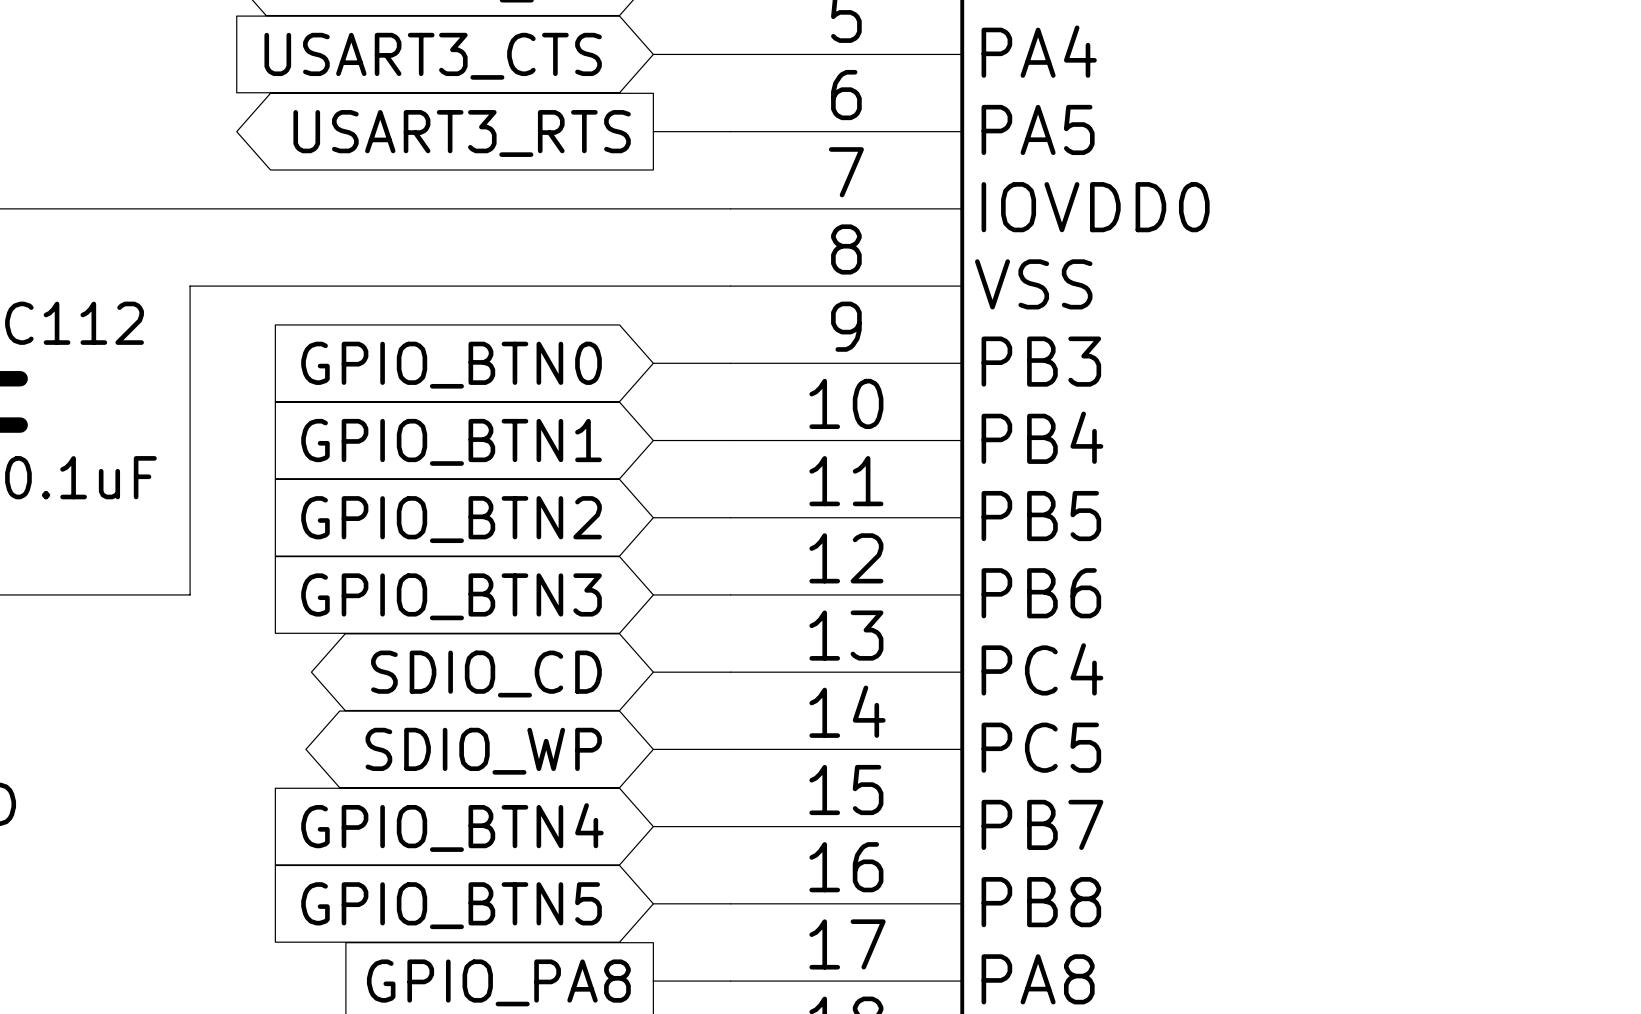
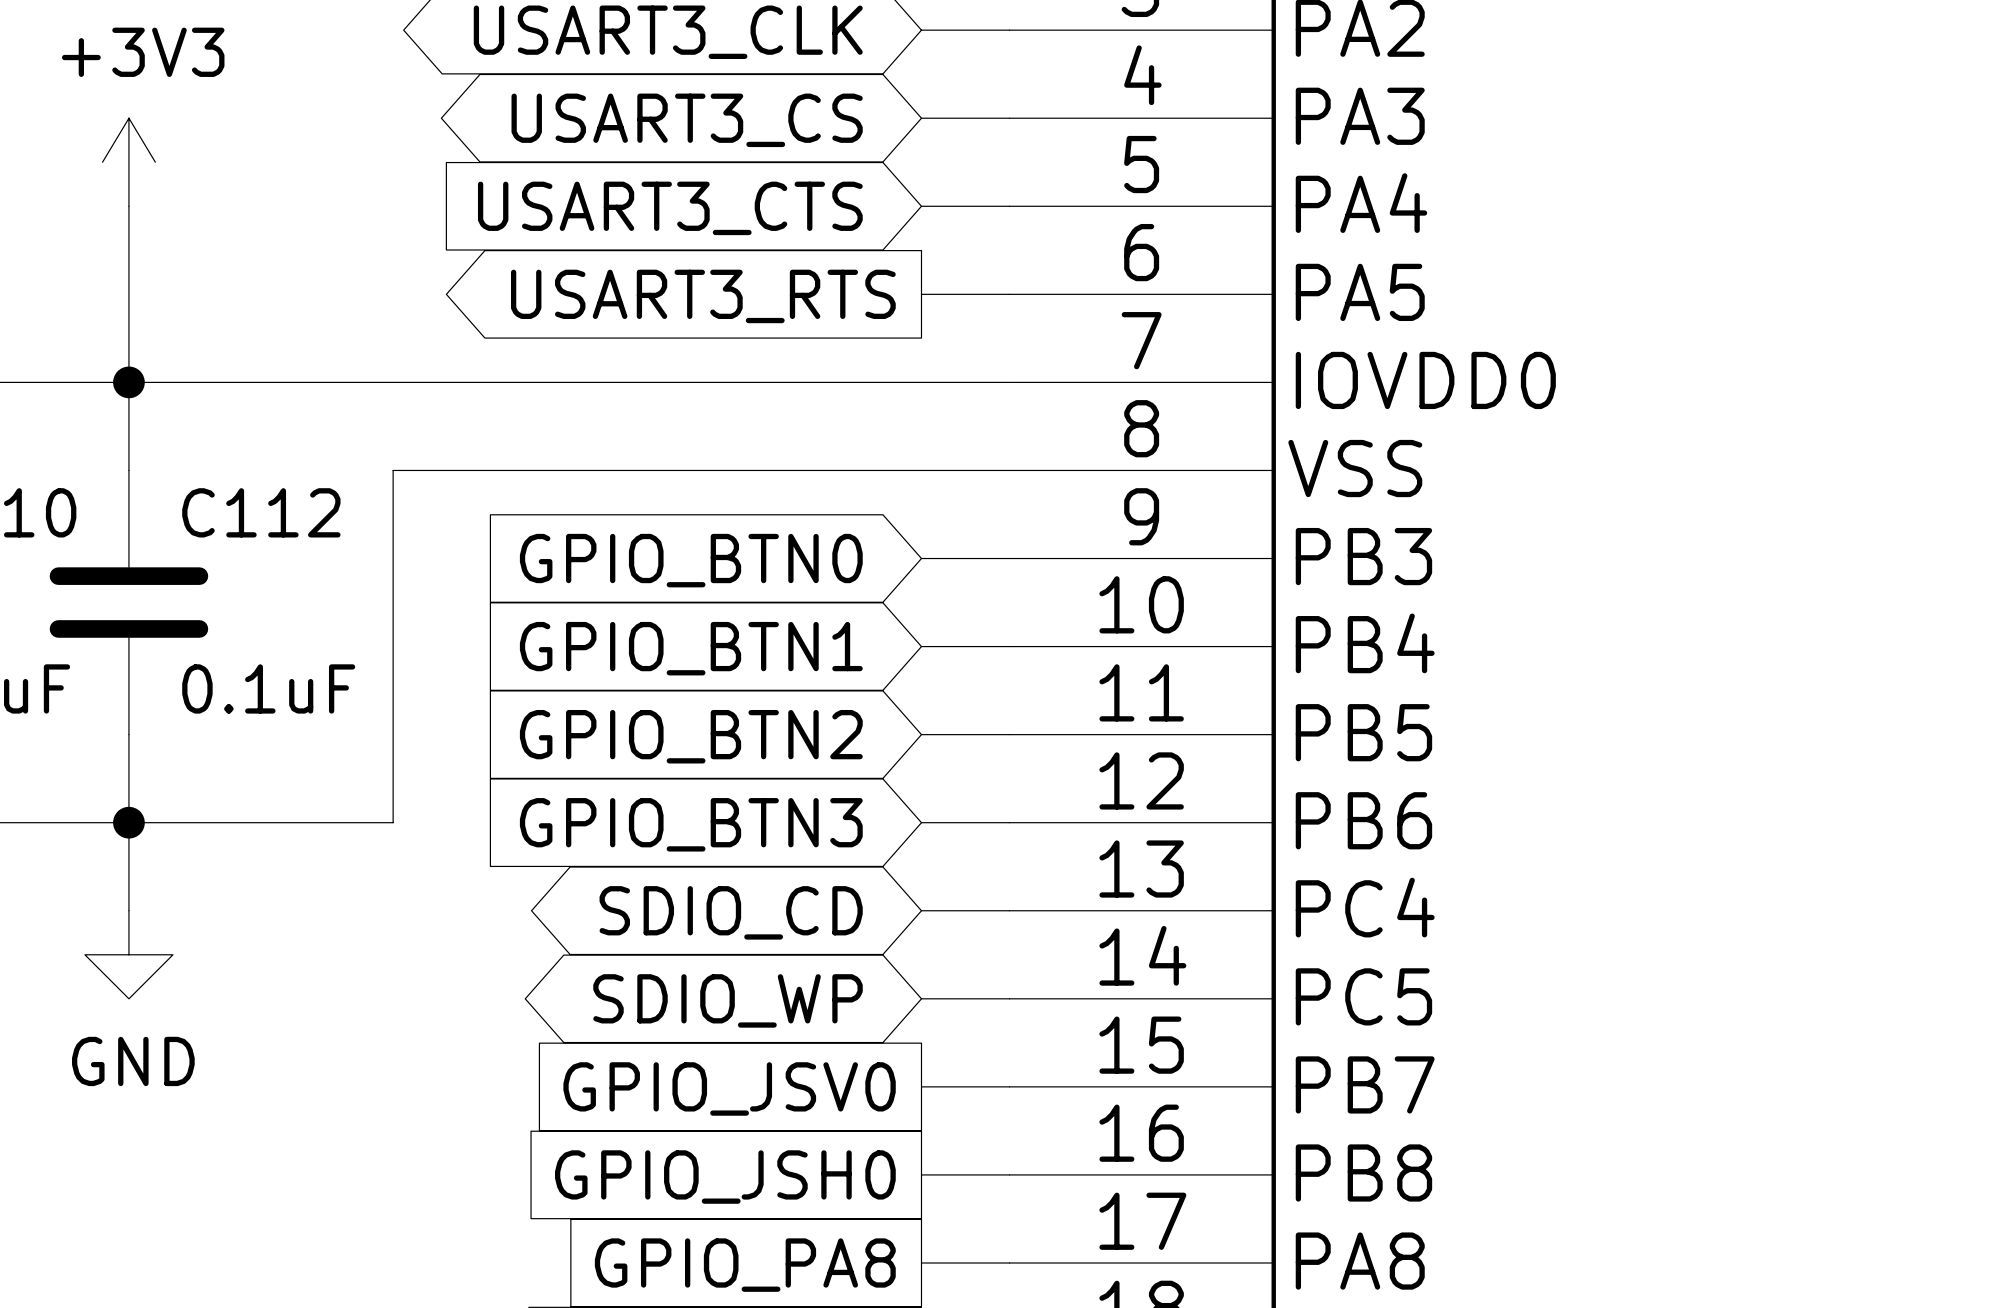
global label shape: input (452, 827) -> passive (729, 1088)
global label: GPIO_BTN4 (452, 827) -> GPIO_JSV0 (729, 1088)
global label shape: input (451, 905) -> passive (725, 1177)
global label: GPIO_BTN5 (451, 905) -> GPIO_JSH0 (725, 1177)

